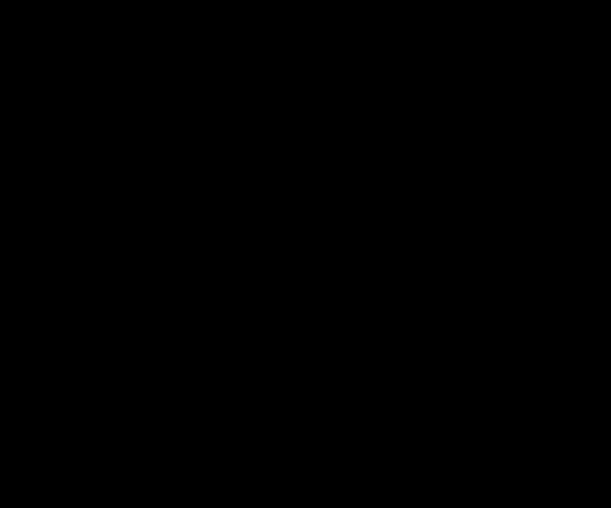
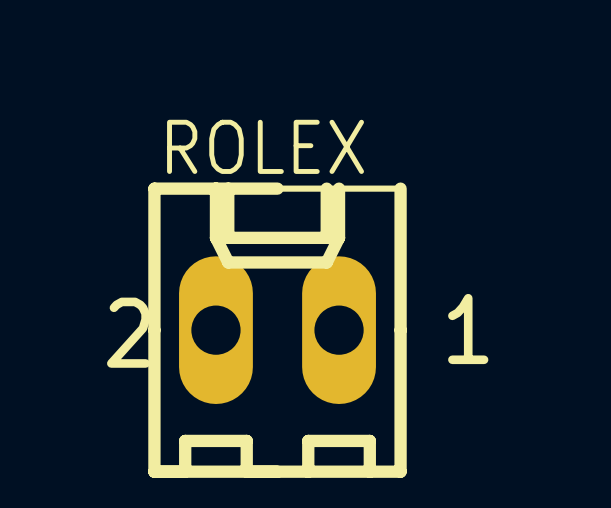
ROLEX: none -> (277, 330)

